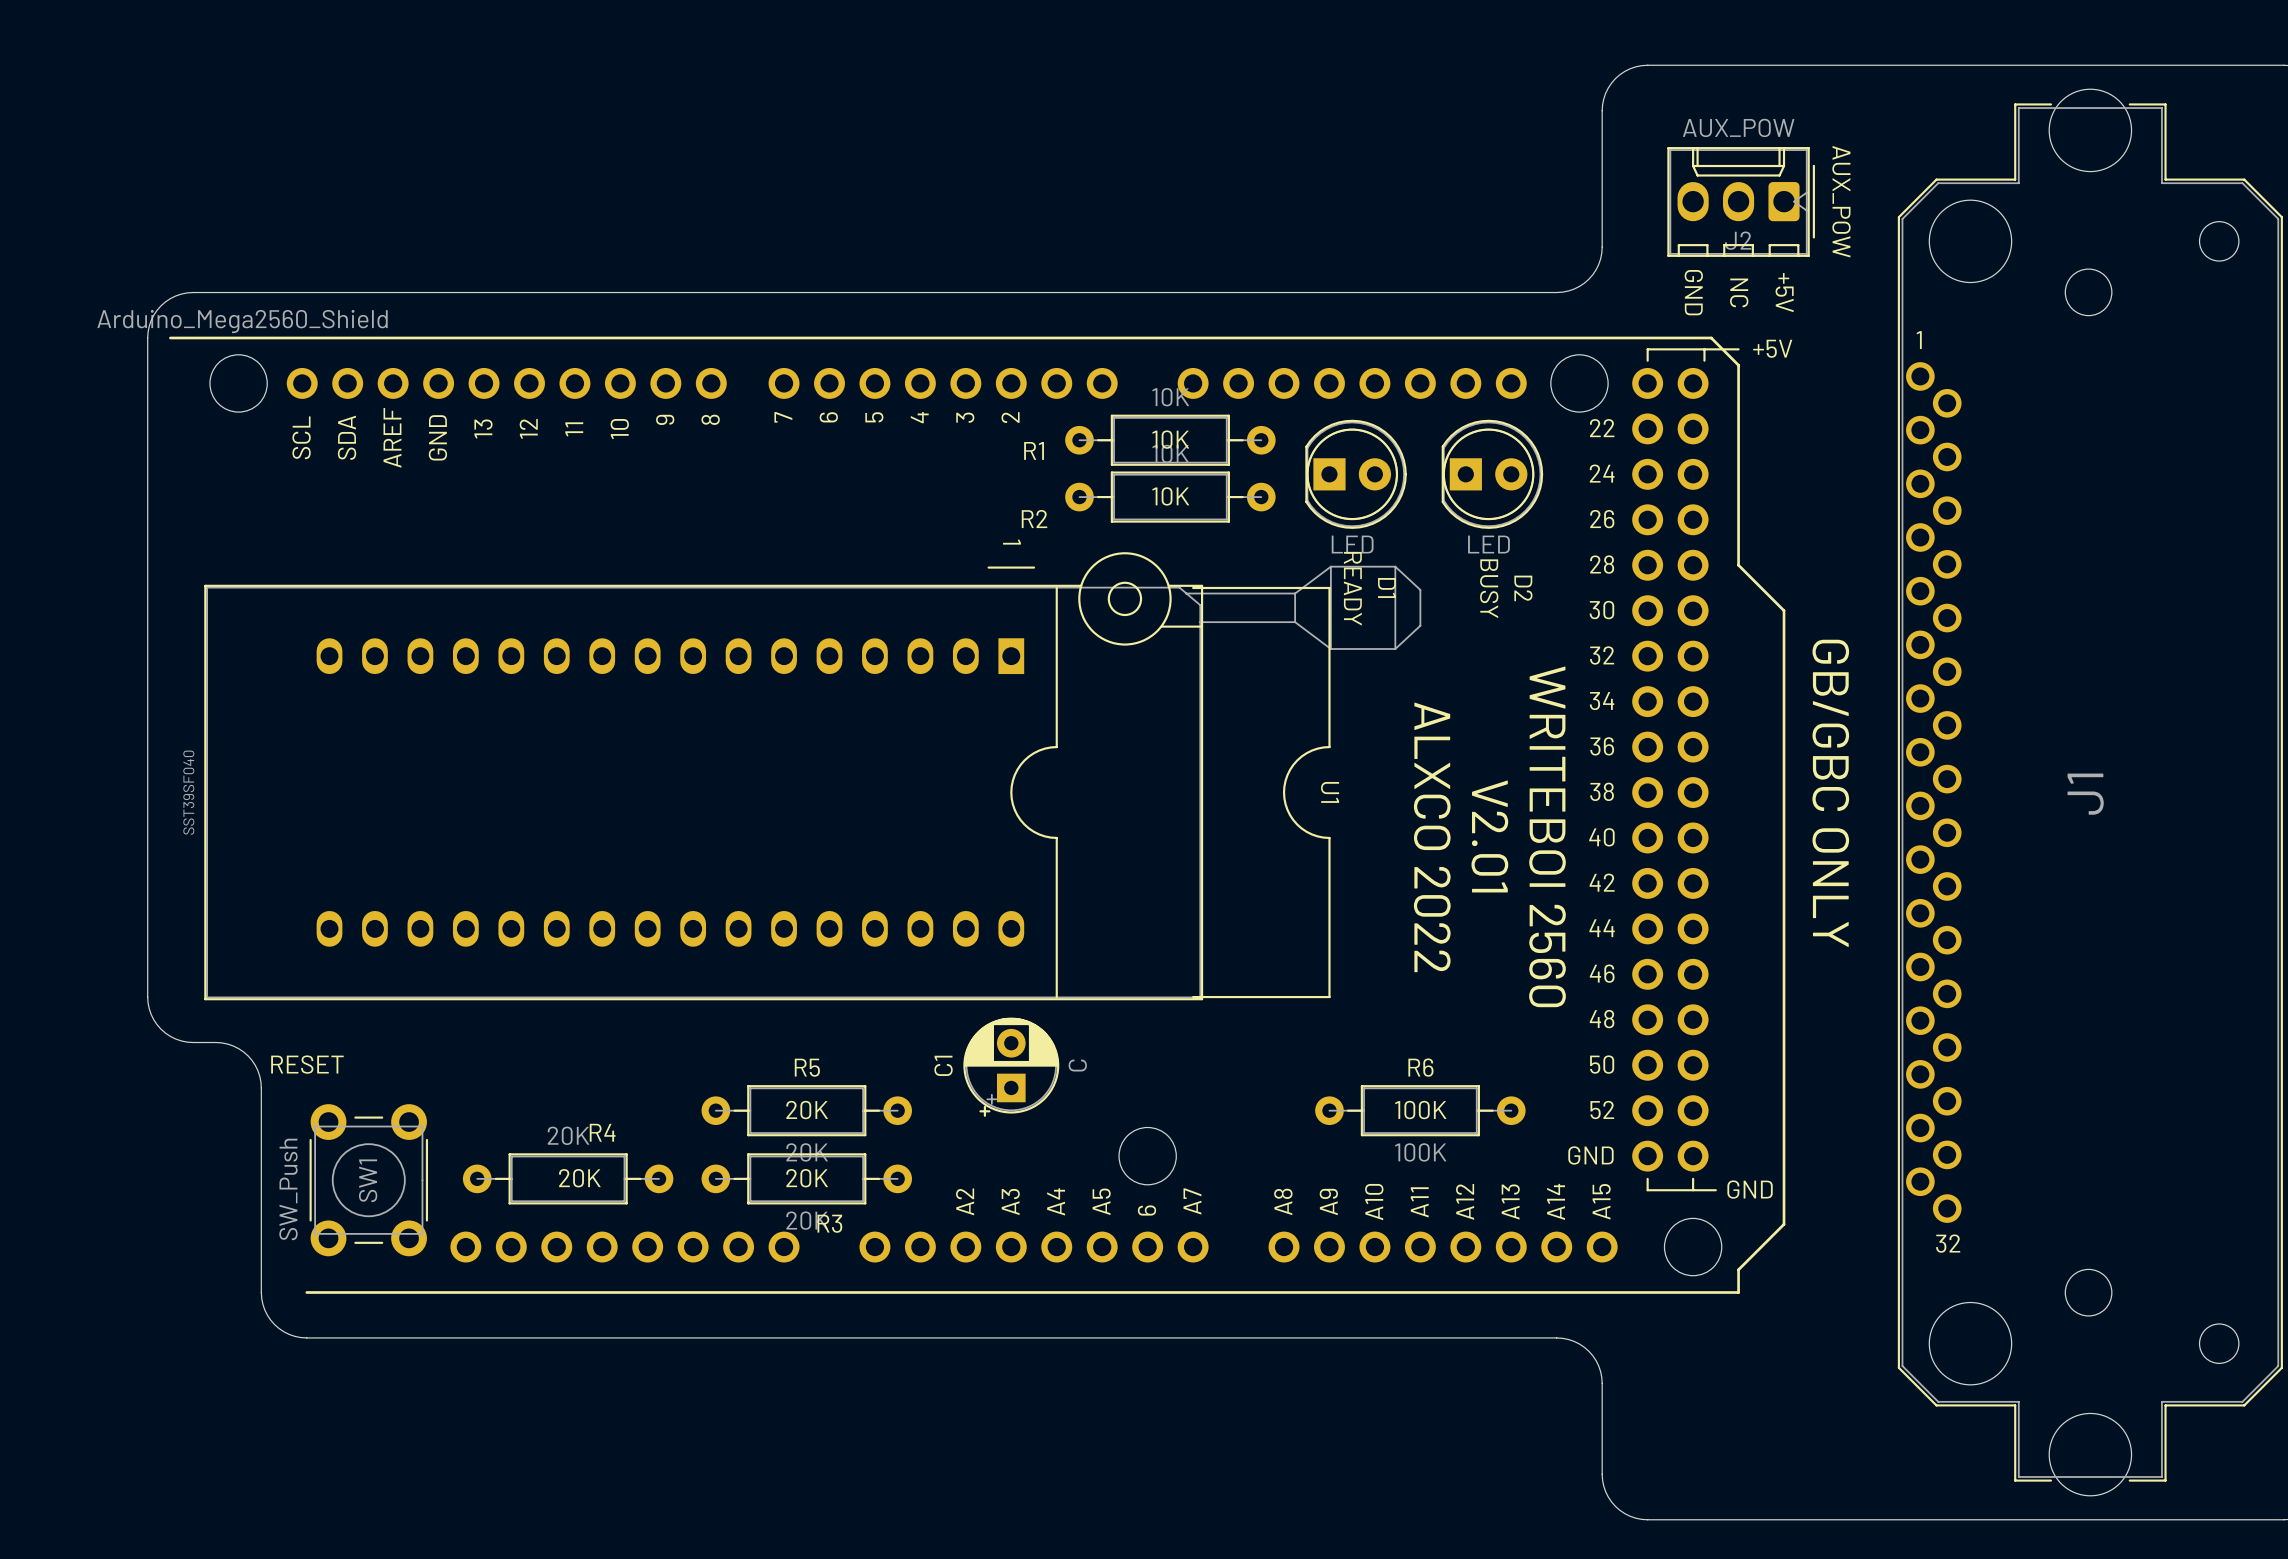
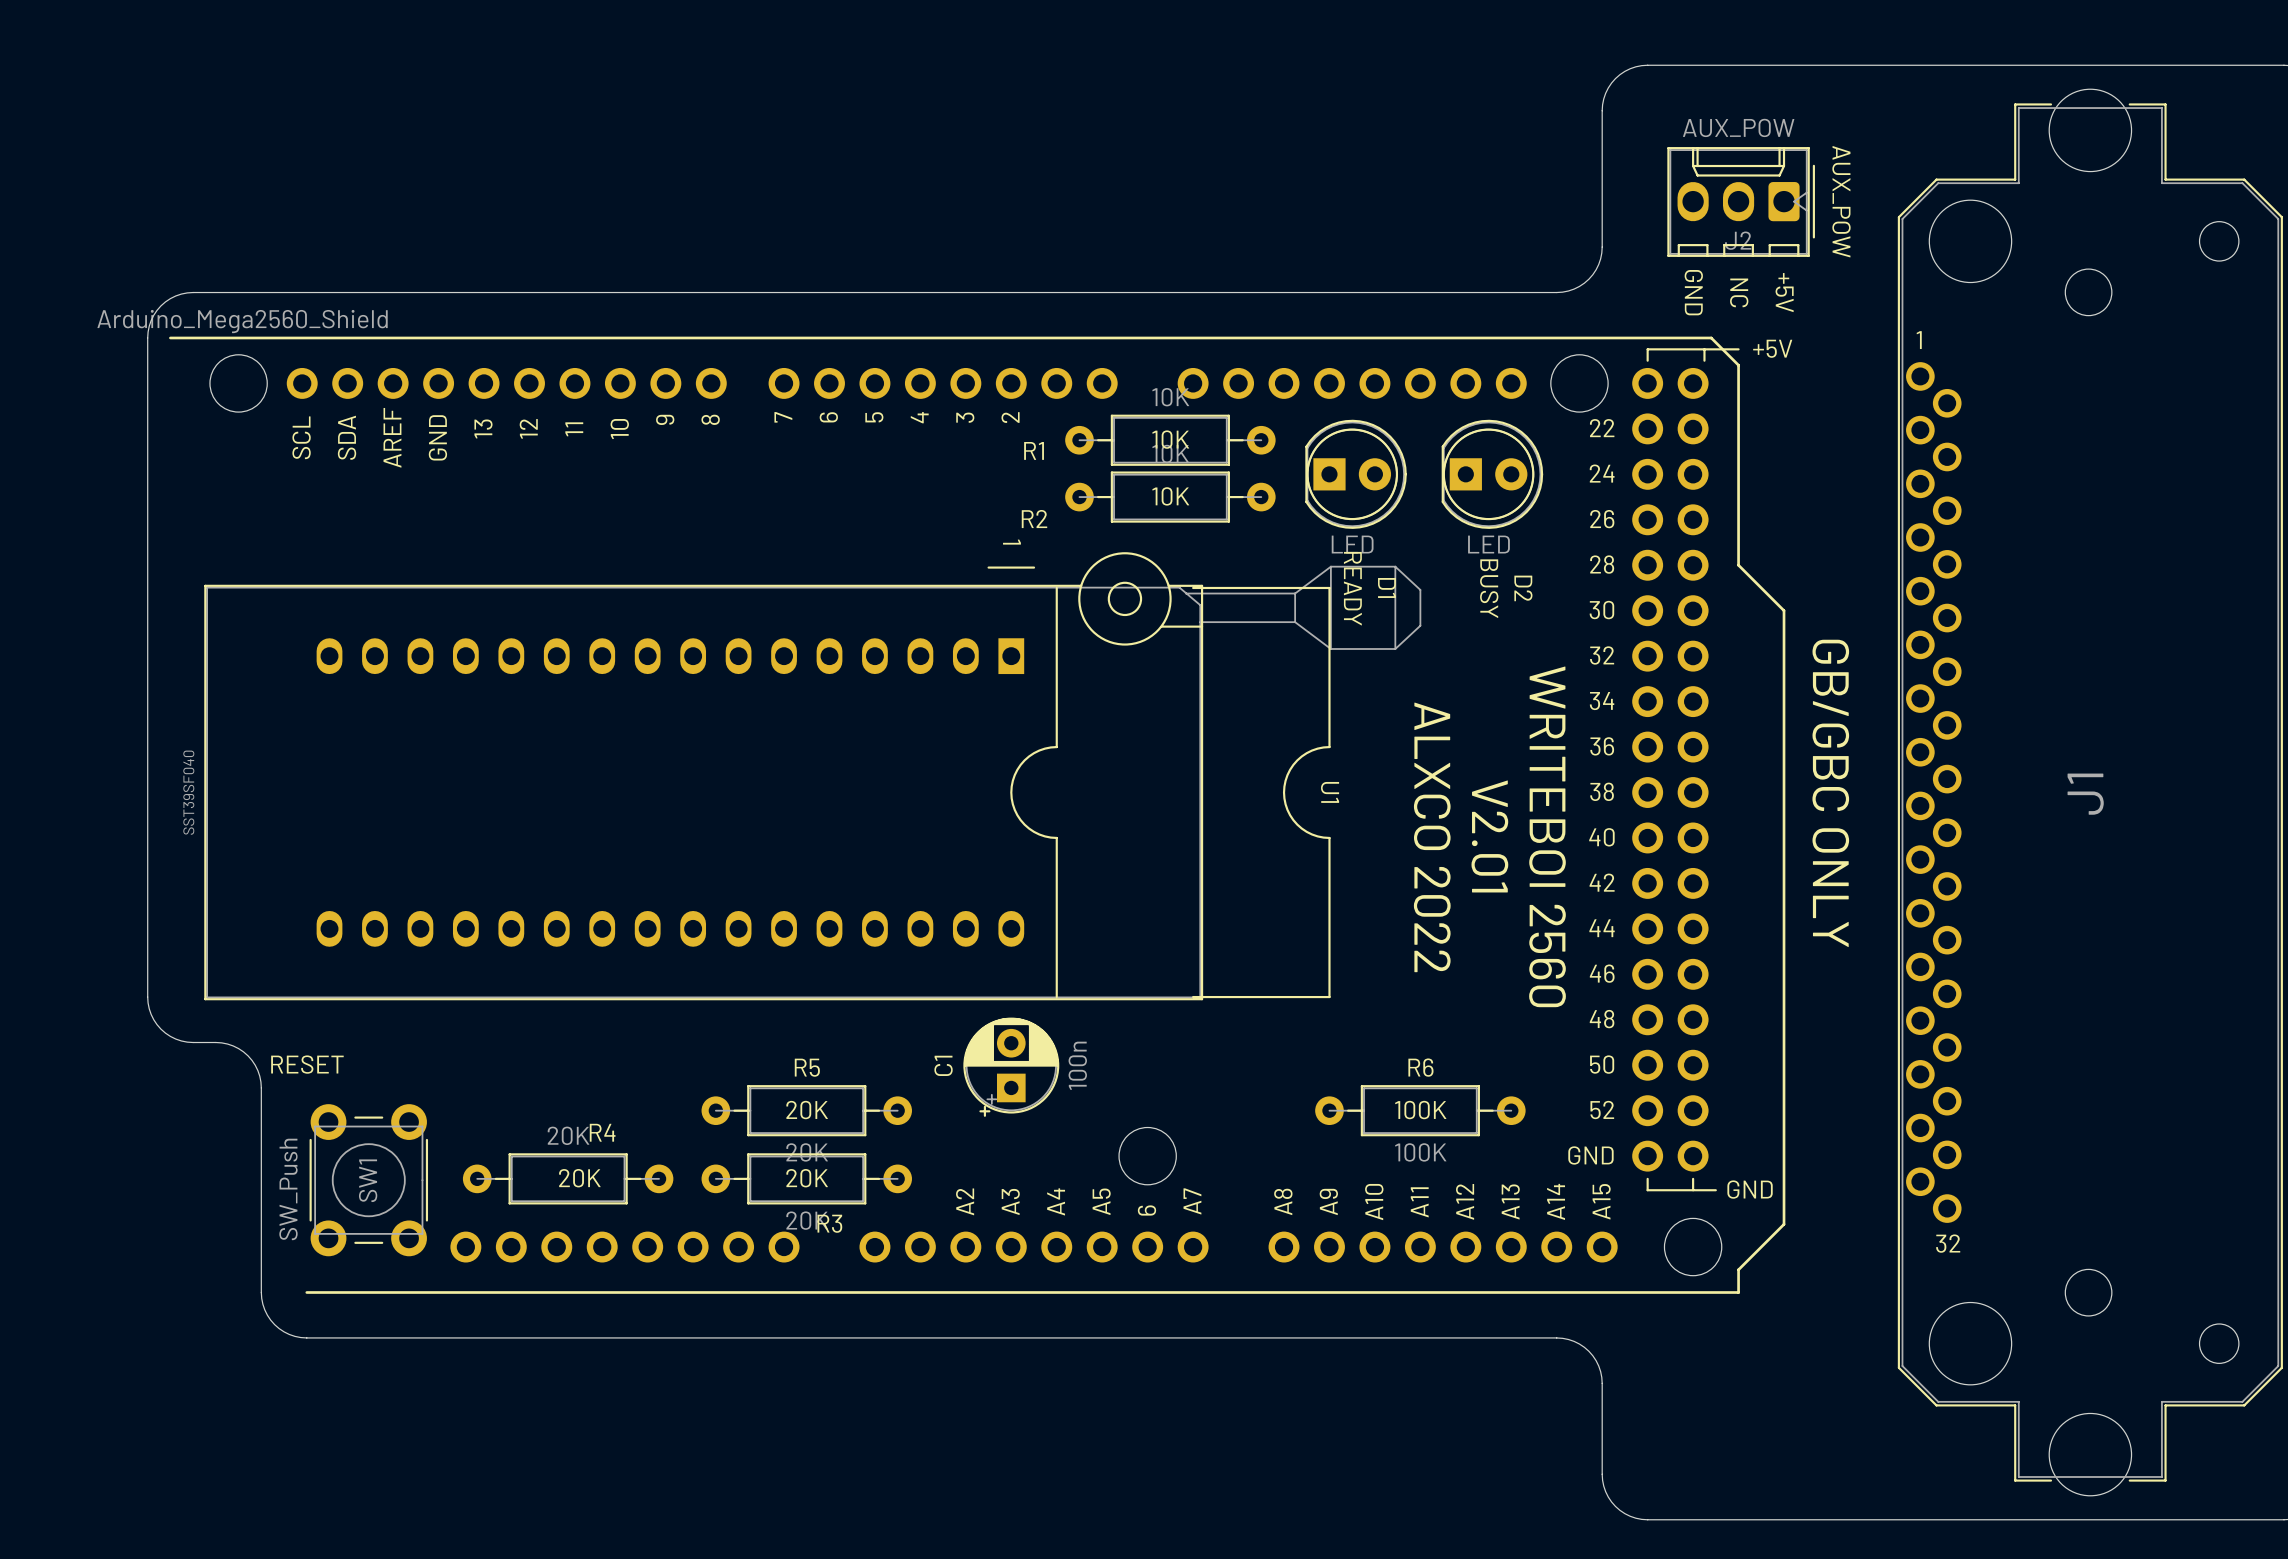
C1 value: C (1077, 1065) -> 100n (1077, 1065)

